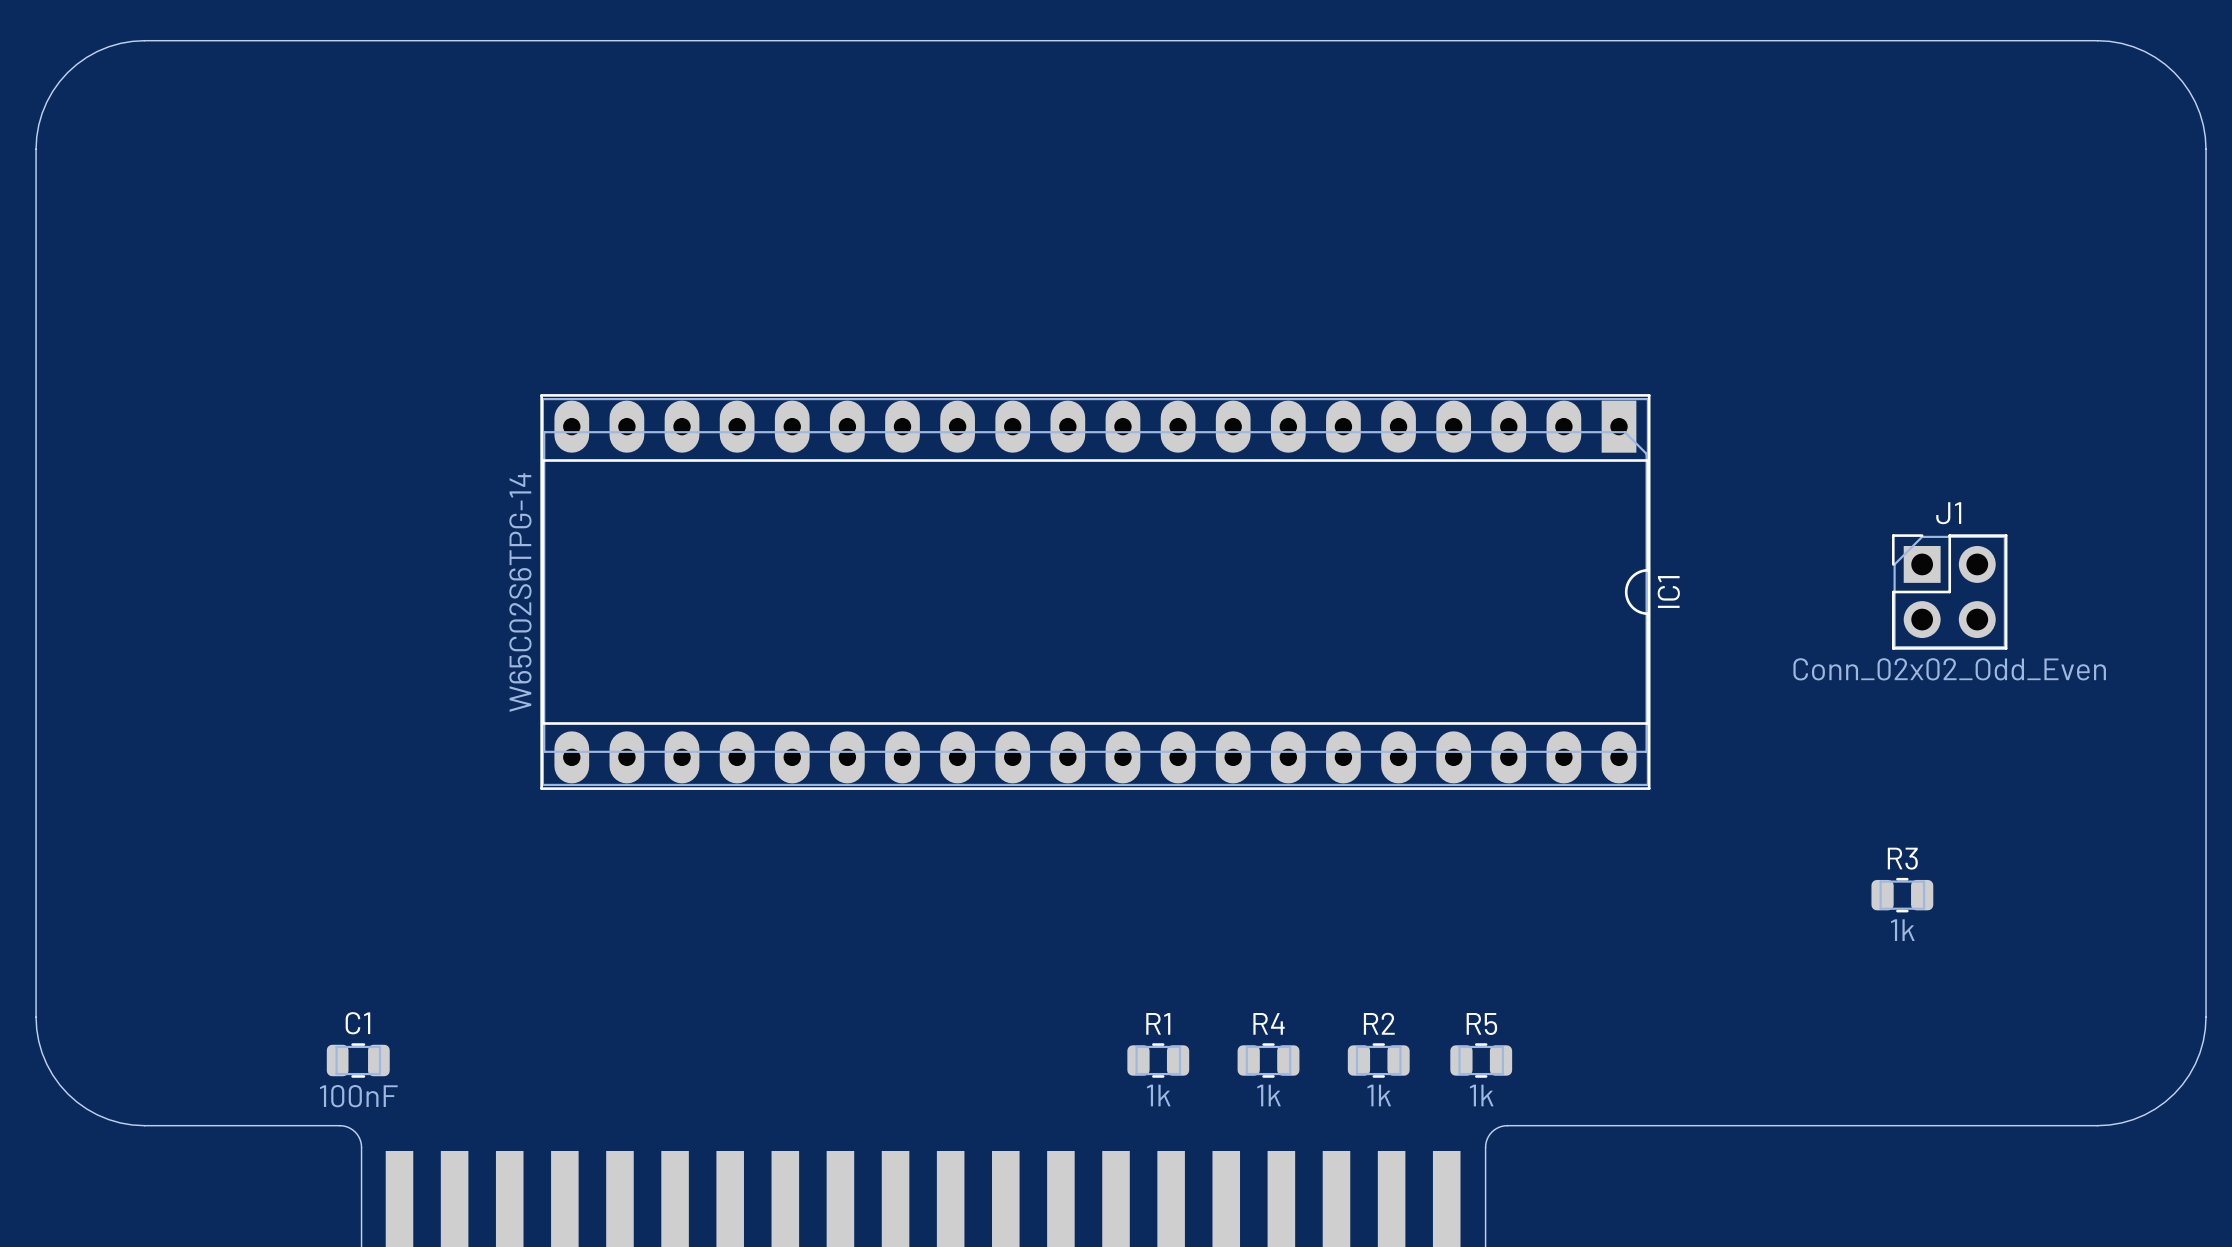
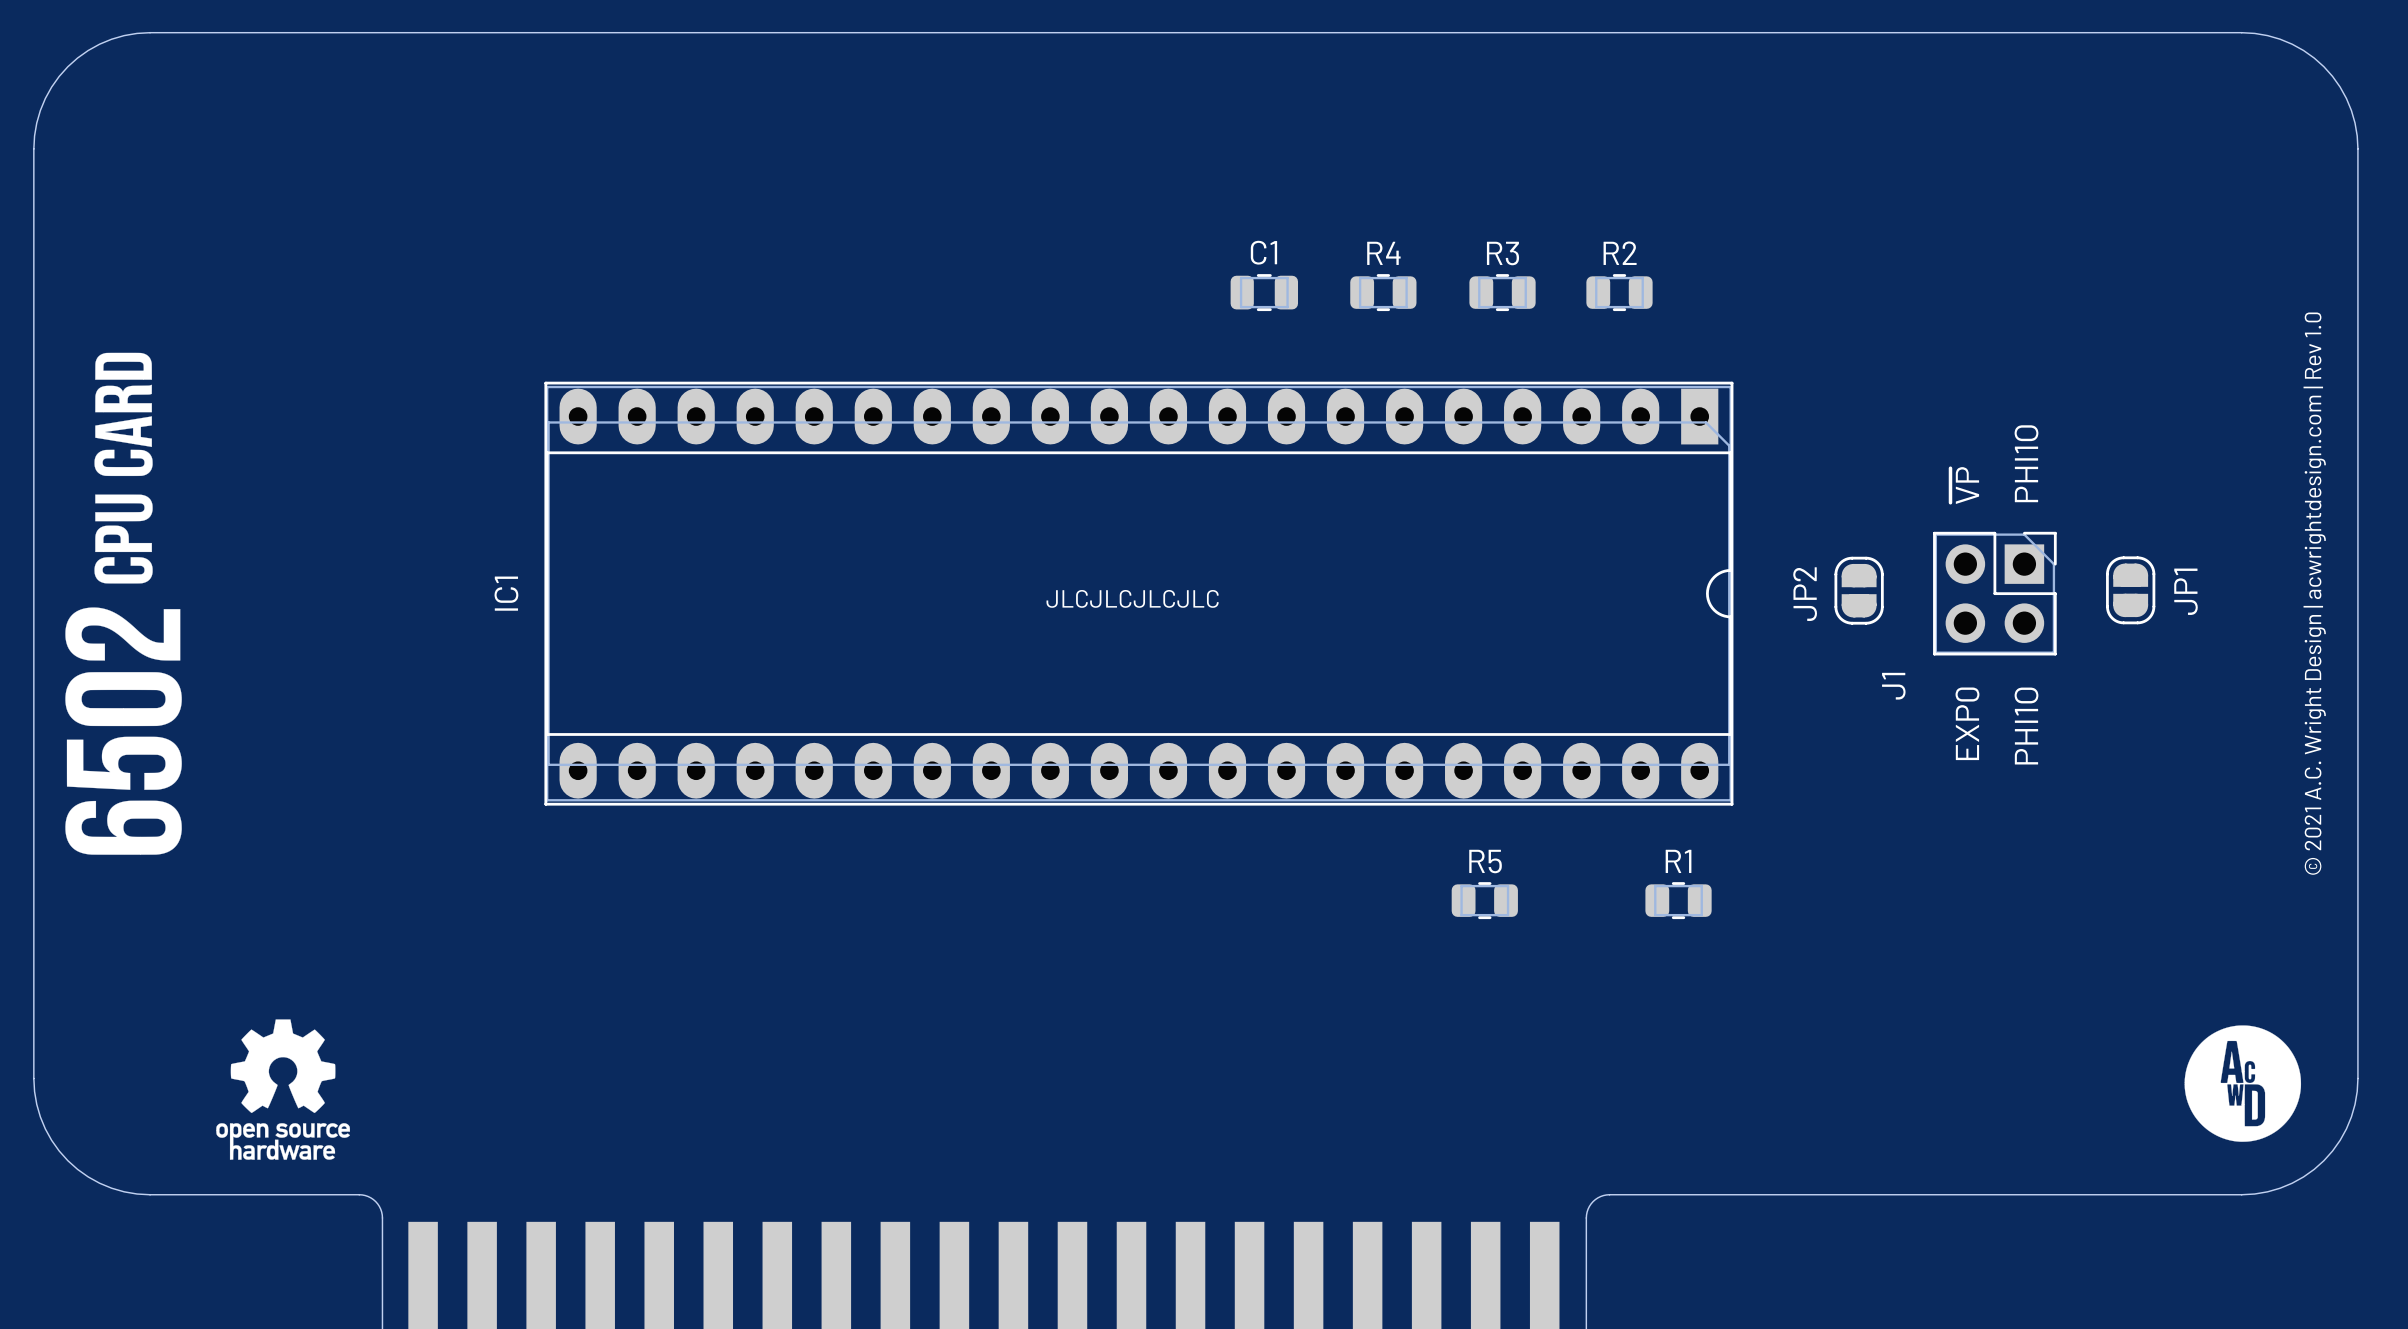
drawing: none -> [65, 352, 182, 855]
text: none -> PHI1O (2026, 463)
text: none -> ~{VP} (1964, 485)
J1 name position: J1 (1948, 513) -> J1 (1893, 686)
JP2: none -> (1859, 590)
JP1: none -> (2130, 590)
text: none -> © 2021 A.C. Wright Design | acwrightdesign.com | Rev 1.0 (2314, 593)
text: none -> JLCJLCJLCJLC (1132, 598)
IC1 name position: IC1 (1668, 591) -> IC1 (506, 593)
IC1 value: W65C02S6TPG-14 (520, 592) -> none
IC1 position: (1095, 592) -> (1138, 593)
J1 rotation: 0° (1949, 592) -> 90° clockwise (1994, 593)
J1 position: (1949, 592) -> (1994, 593)
J1 value: Conn_02x02_Odd_Even (1949, 669) -> none
text: none -> EXP0 (1967, 723)
text: none -> PHI1O (2026, 726)
R3 position: (1902, 895) -> (1502, 292)
R3 value: 1k (1902, 930) -> none
drawing: none -> [216, 1019, 351, 1160]
drawing: none -> [2184, 1025, 2302, 1142]
C1 position: (358, 1060) -> (1264, 292)
R1 position: (1158, 1060) -> (1678, 900)
R4 position: (1268, 1060) -> (1383, 292)
R2 position: (1378, 1060) -> (1619, 292)
R5 position: (1481, 1060) -> (1484, 900)
R1 value: 1k (1158, 1095) -> none
R4 value: 1k (1268, 1095) -> none
R2 value: 1k (1379, 1095) -> none
R5 value: 1k (1481, 1095) -> none
C1 value: 100nF (358, 1096) -> none

